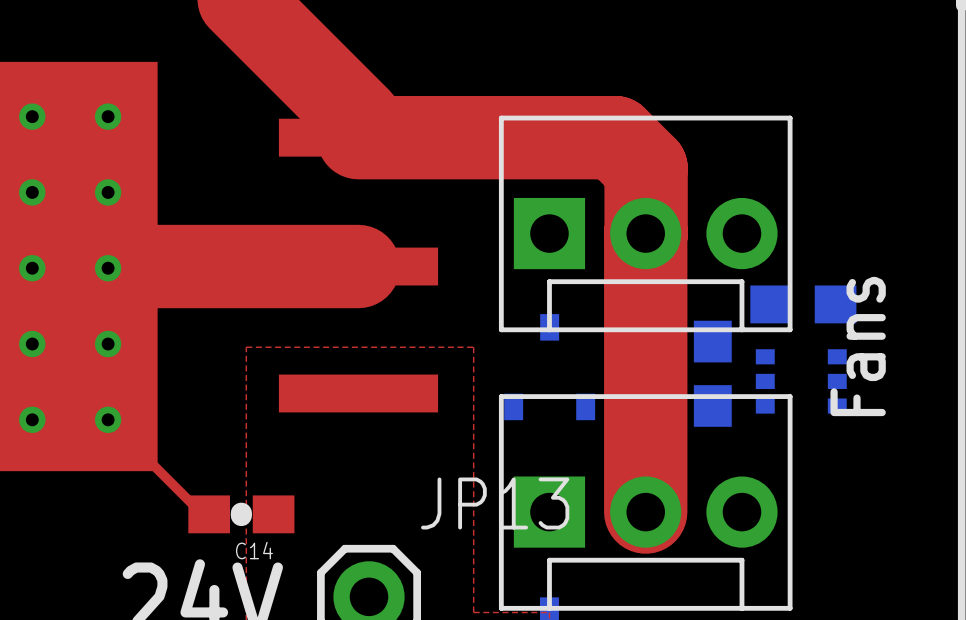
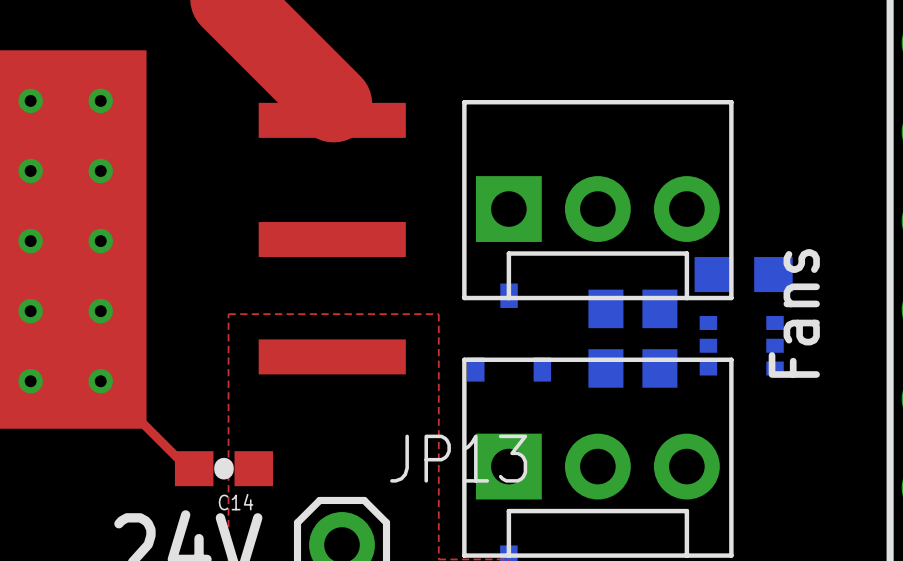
top track: (359, 119) (358, 137) (615, 137) (646, 168) (646, 233) -> none
top track: (645, 233) (645, 512) -> none
top track: (358, 266) (109, 266) (108, 268) -> none

